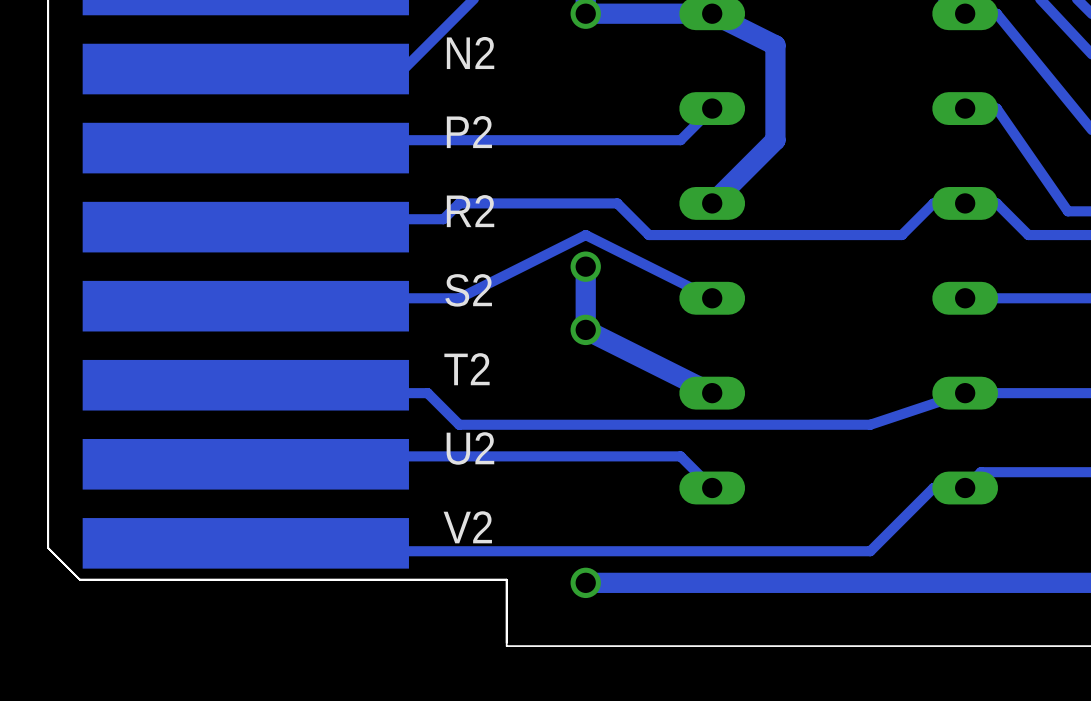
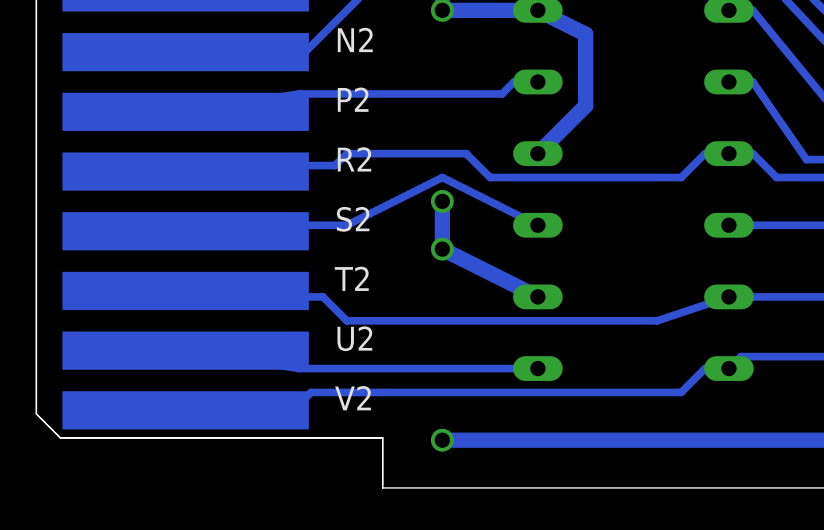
track: (712, 108) (680, 140) (380, 140) (245, 148) -> (537, 81) (514, 81) (502, 93) (299, 93) (185, 111)
track: (245, 464) (396, 456) (680, 456) (712, 488) -> (185, 350) (299, 368) (537, 368)
track: (901, 519) (870, 551) (380, 551) (364, 535) (245, 543) -> (681, 392) (311, 392) (299, 404) (185, 410)

